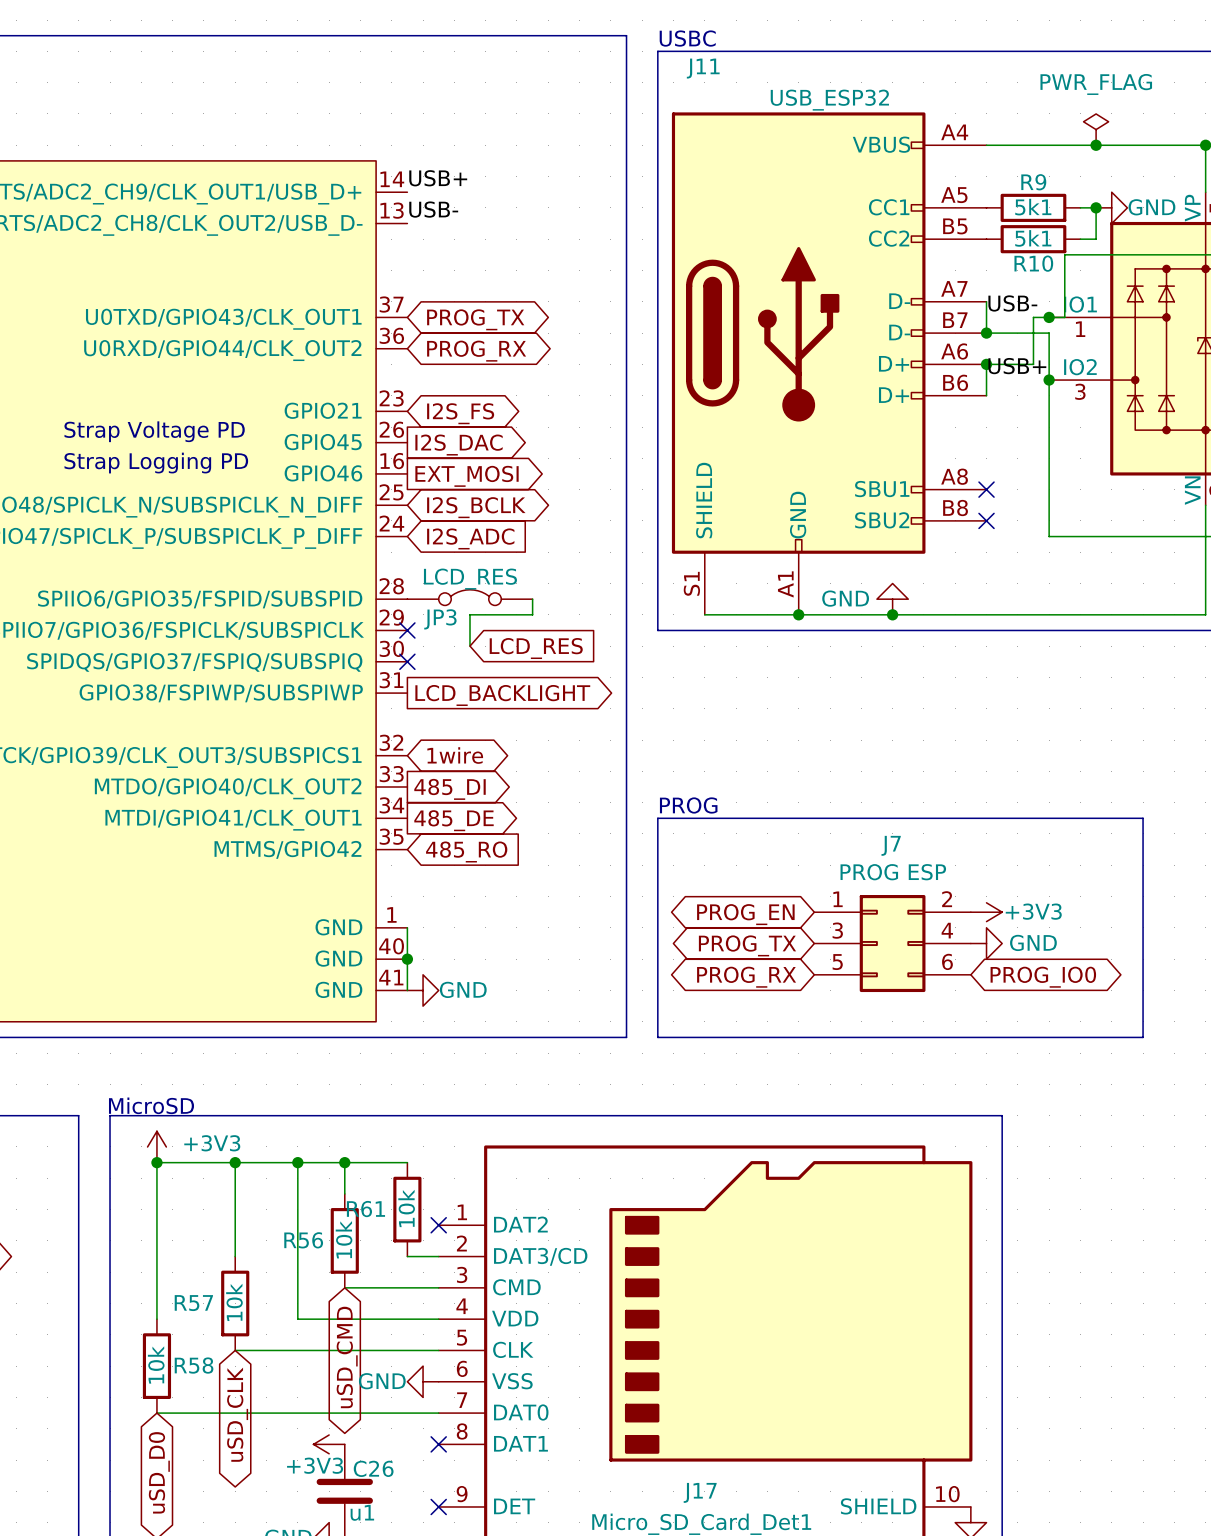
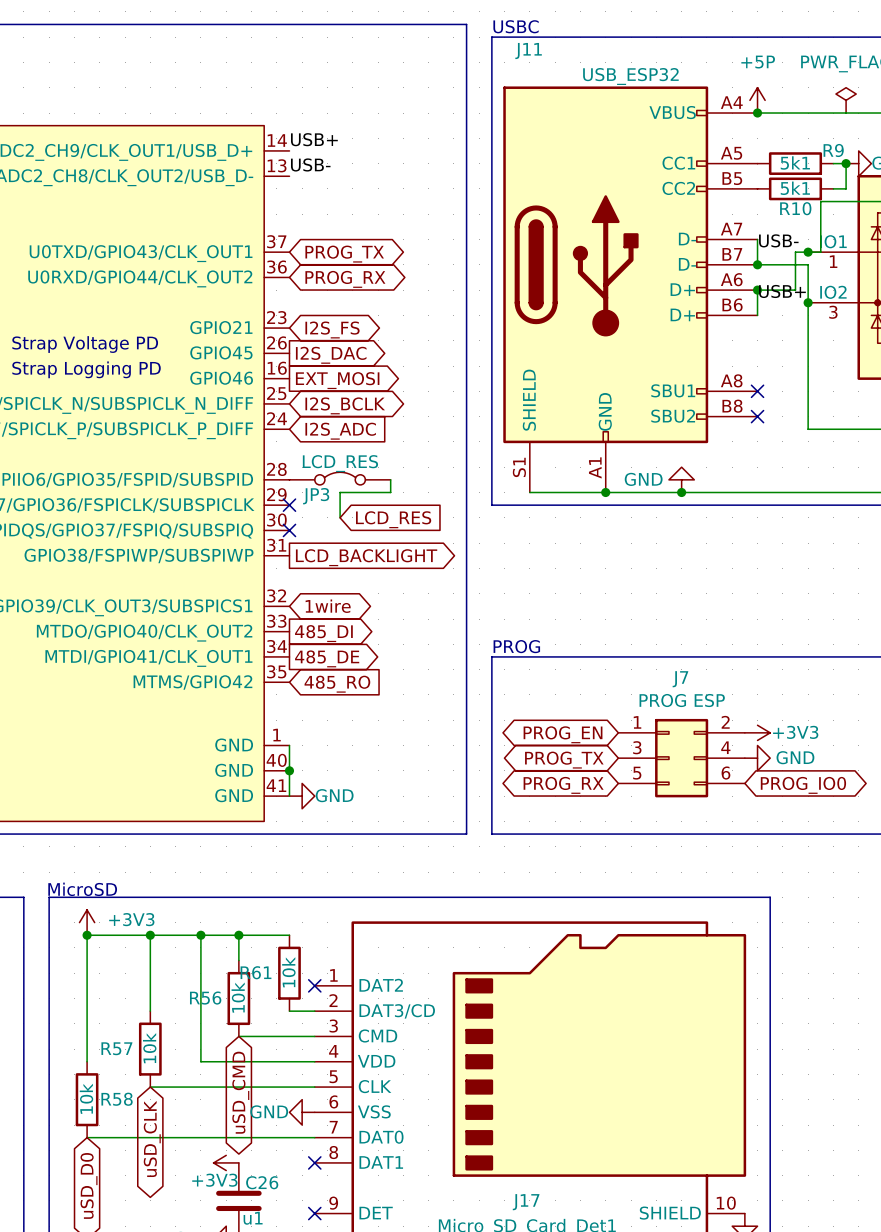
power symbol: none -> +5P (757, 100)
junction: none -> (757, 113)
junction: (1096, 145) -> none
R9 name position: R9 (1033, 182) -> R9 (833, 150)

